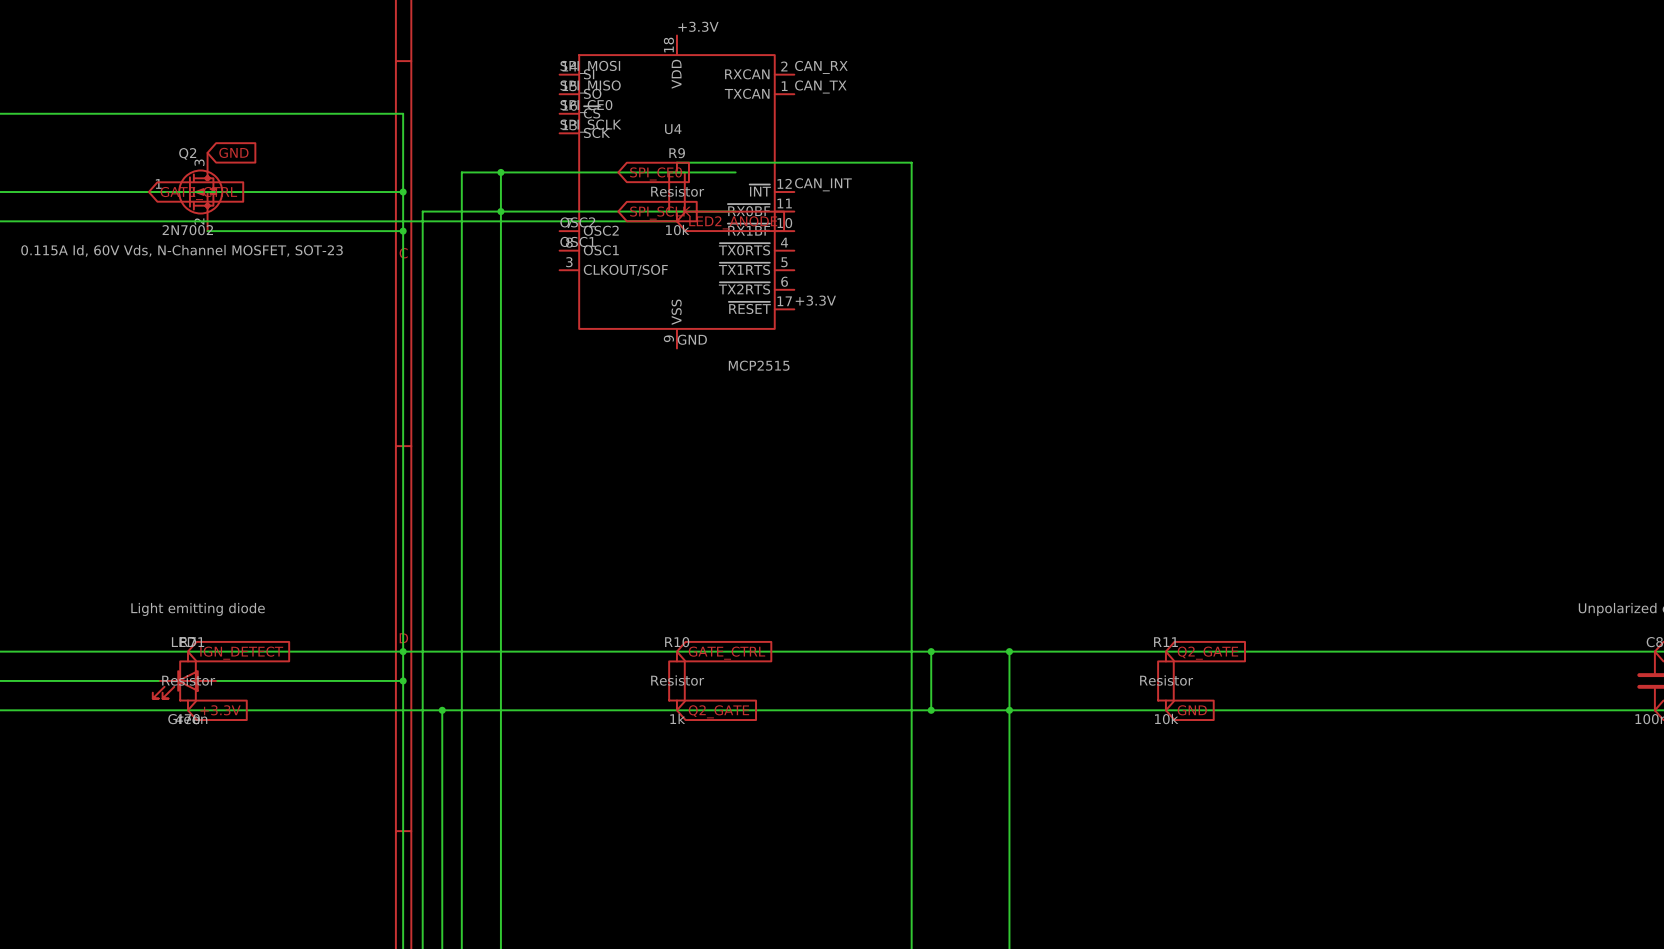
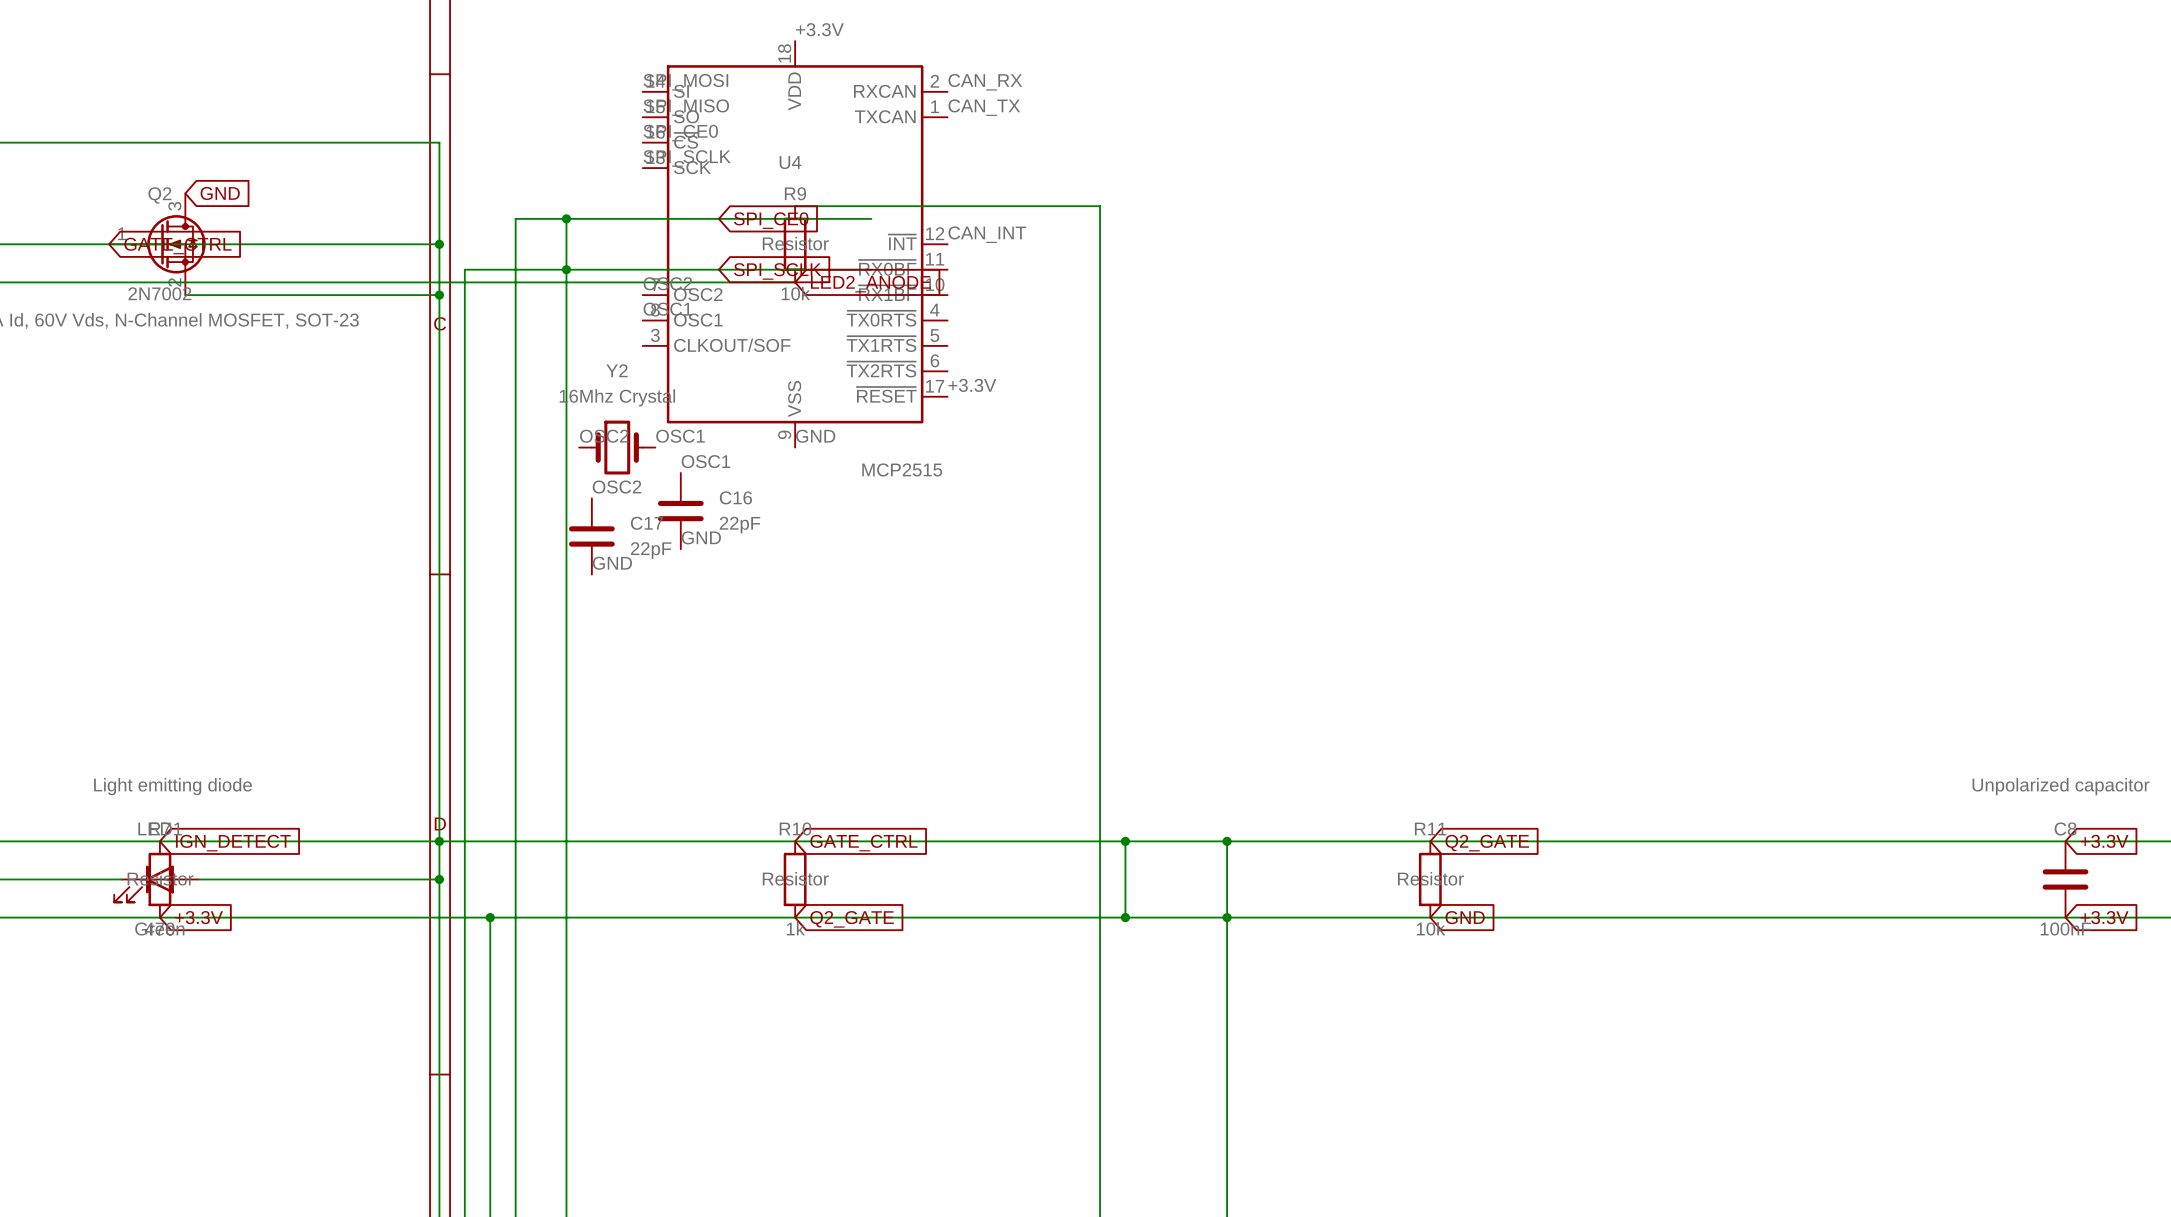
label: none -> OSC2 (604, 436)
label: none -> OSC1 (680, 436)
Y2: none -> 16Mhz Crystal (617, 447)
label: none -> OSC1 (705, 461)
label: none -> OSC2 (616, 487)
C16: none -> 22pF (680, 511)
C17: none -> 22pF (591, 536)
label: none -> GND (701, 537)
label: none -> GND (612, 563)

